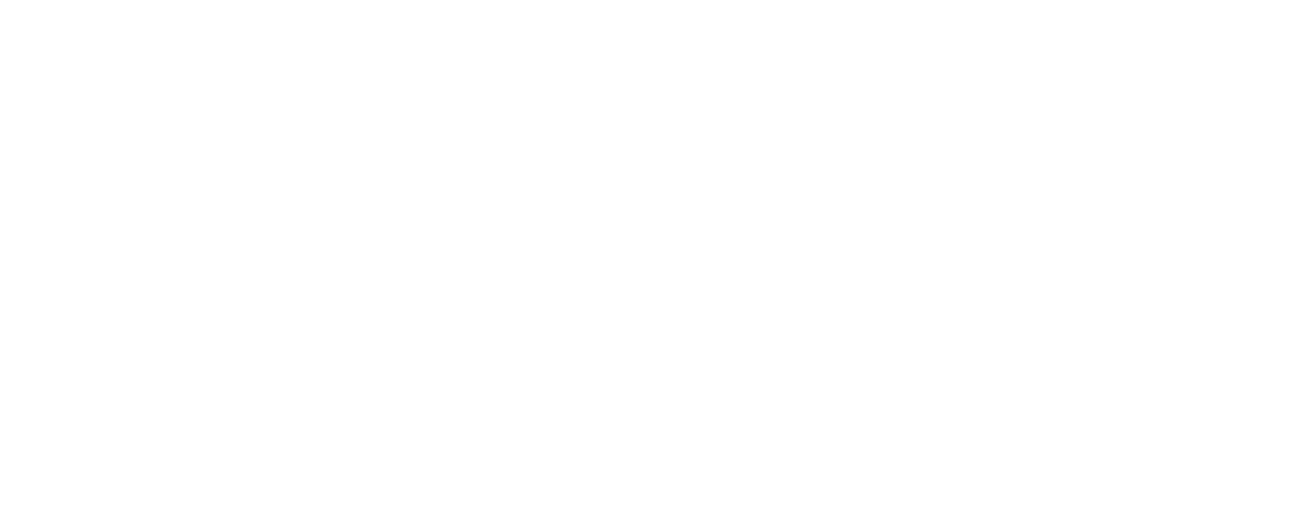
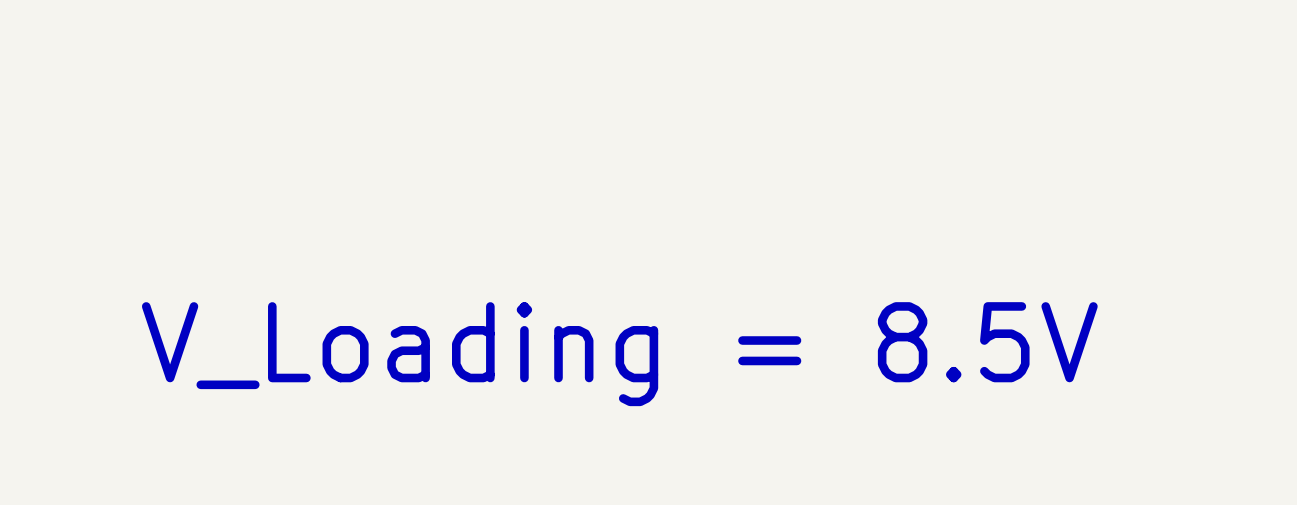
text: none -> V_Loading = 8.5V (619, 354)

